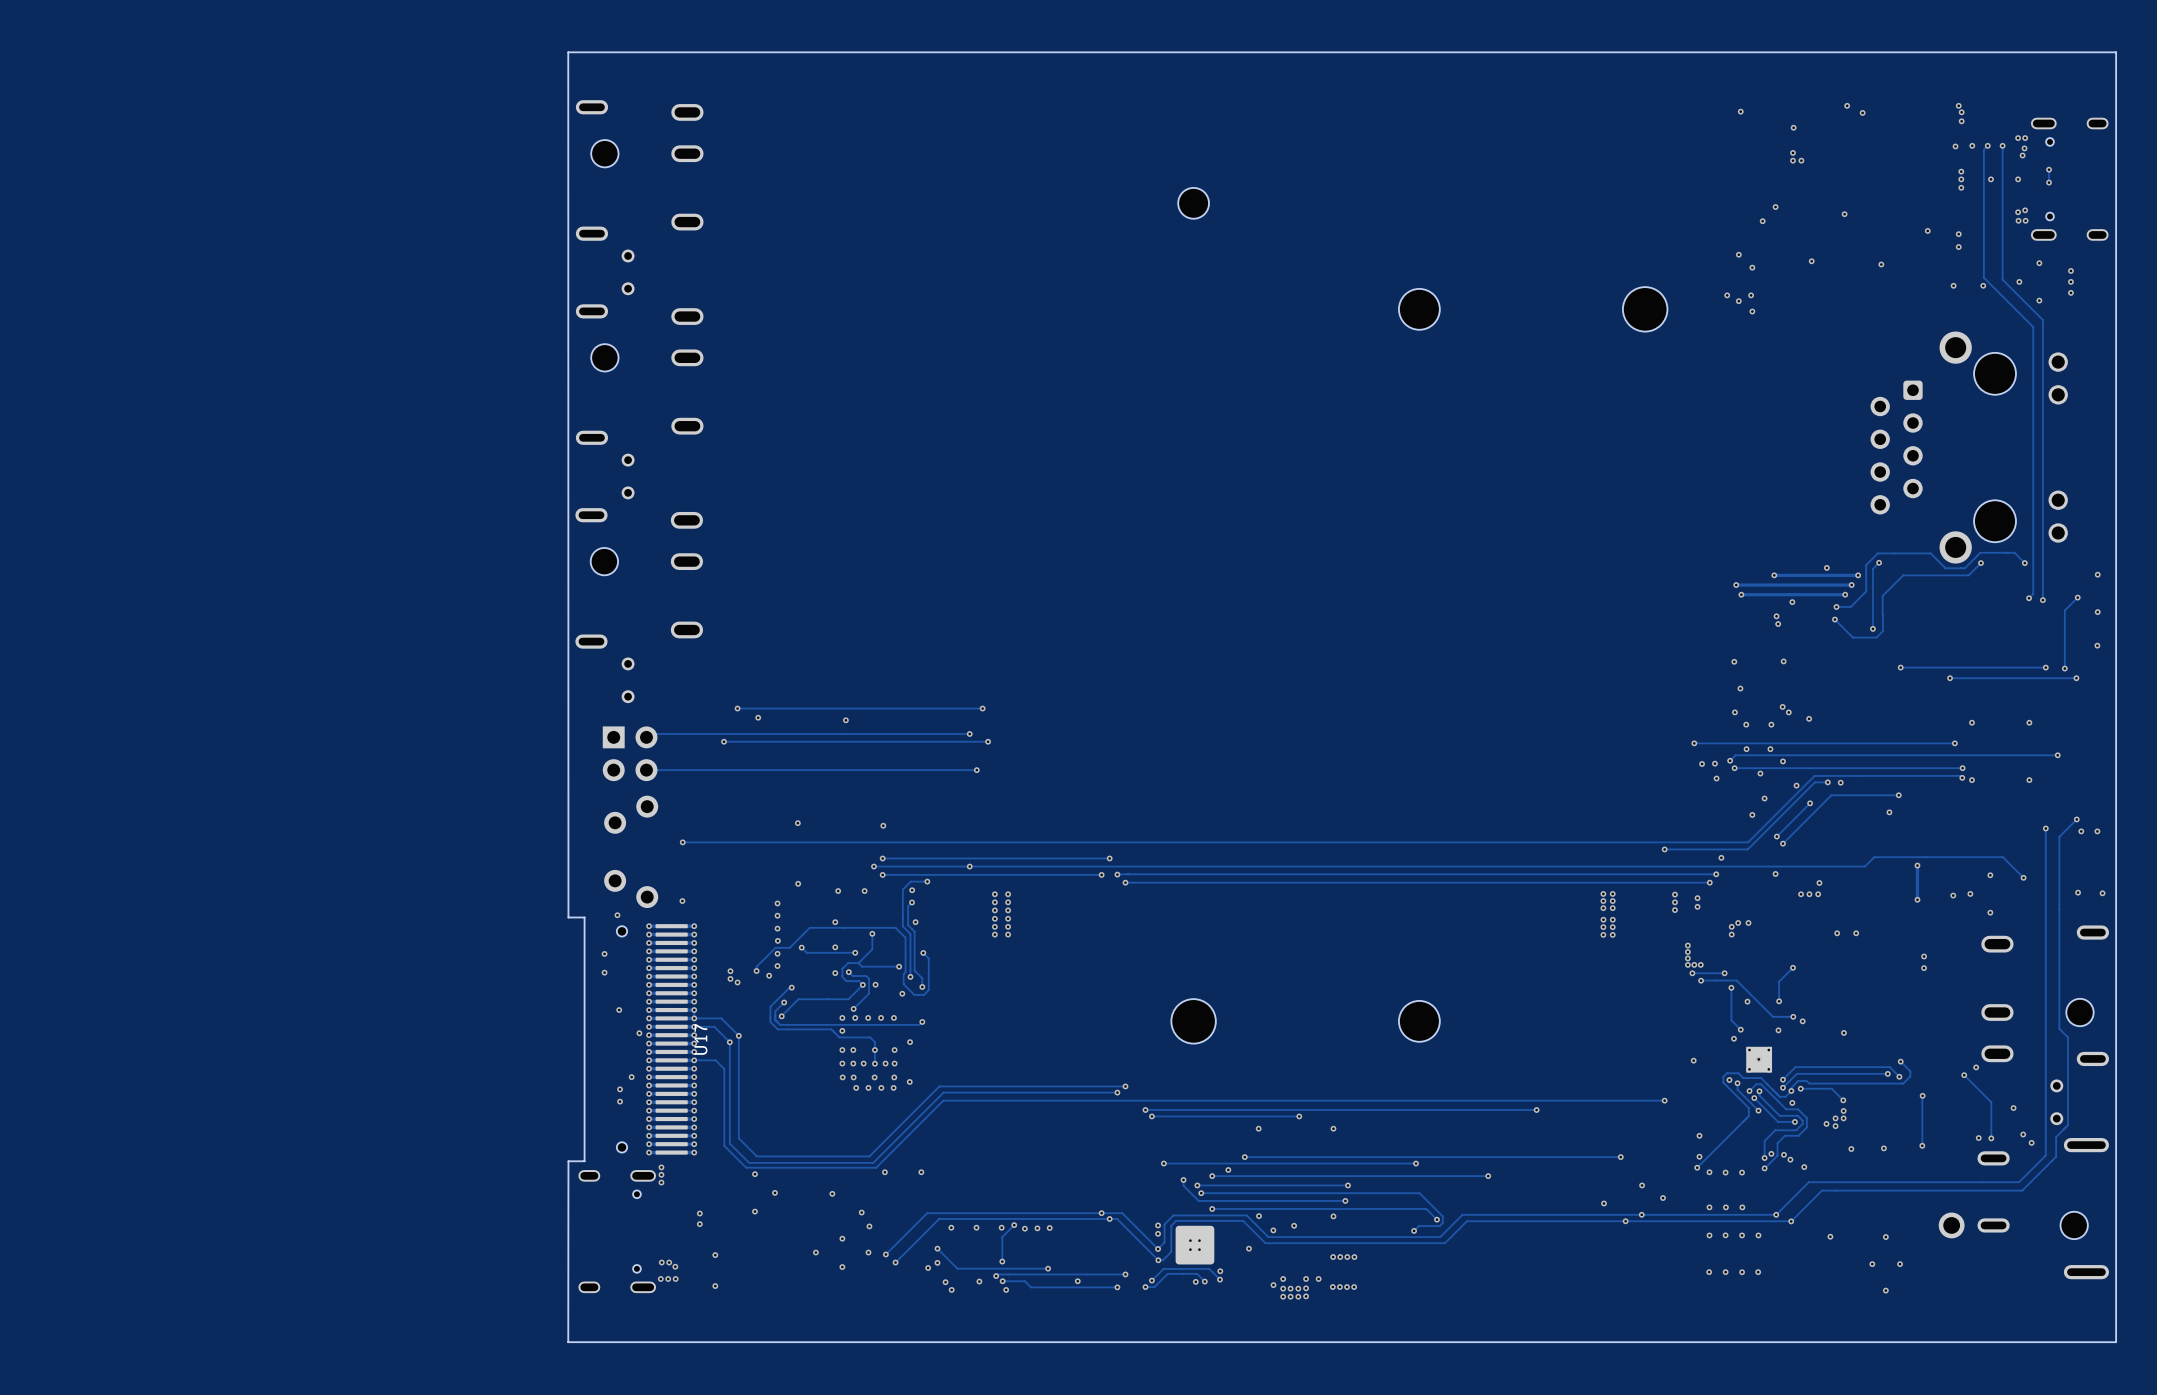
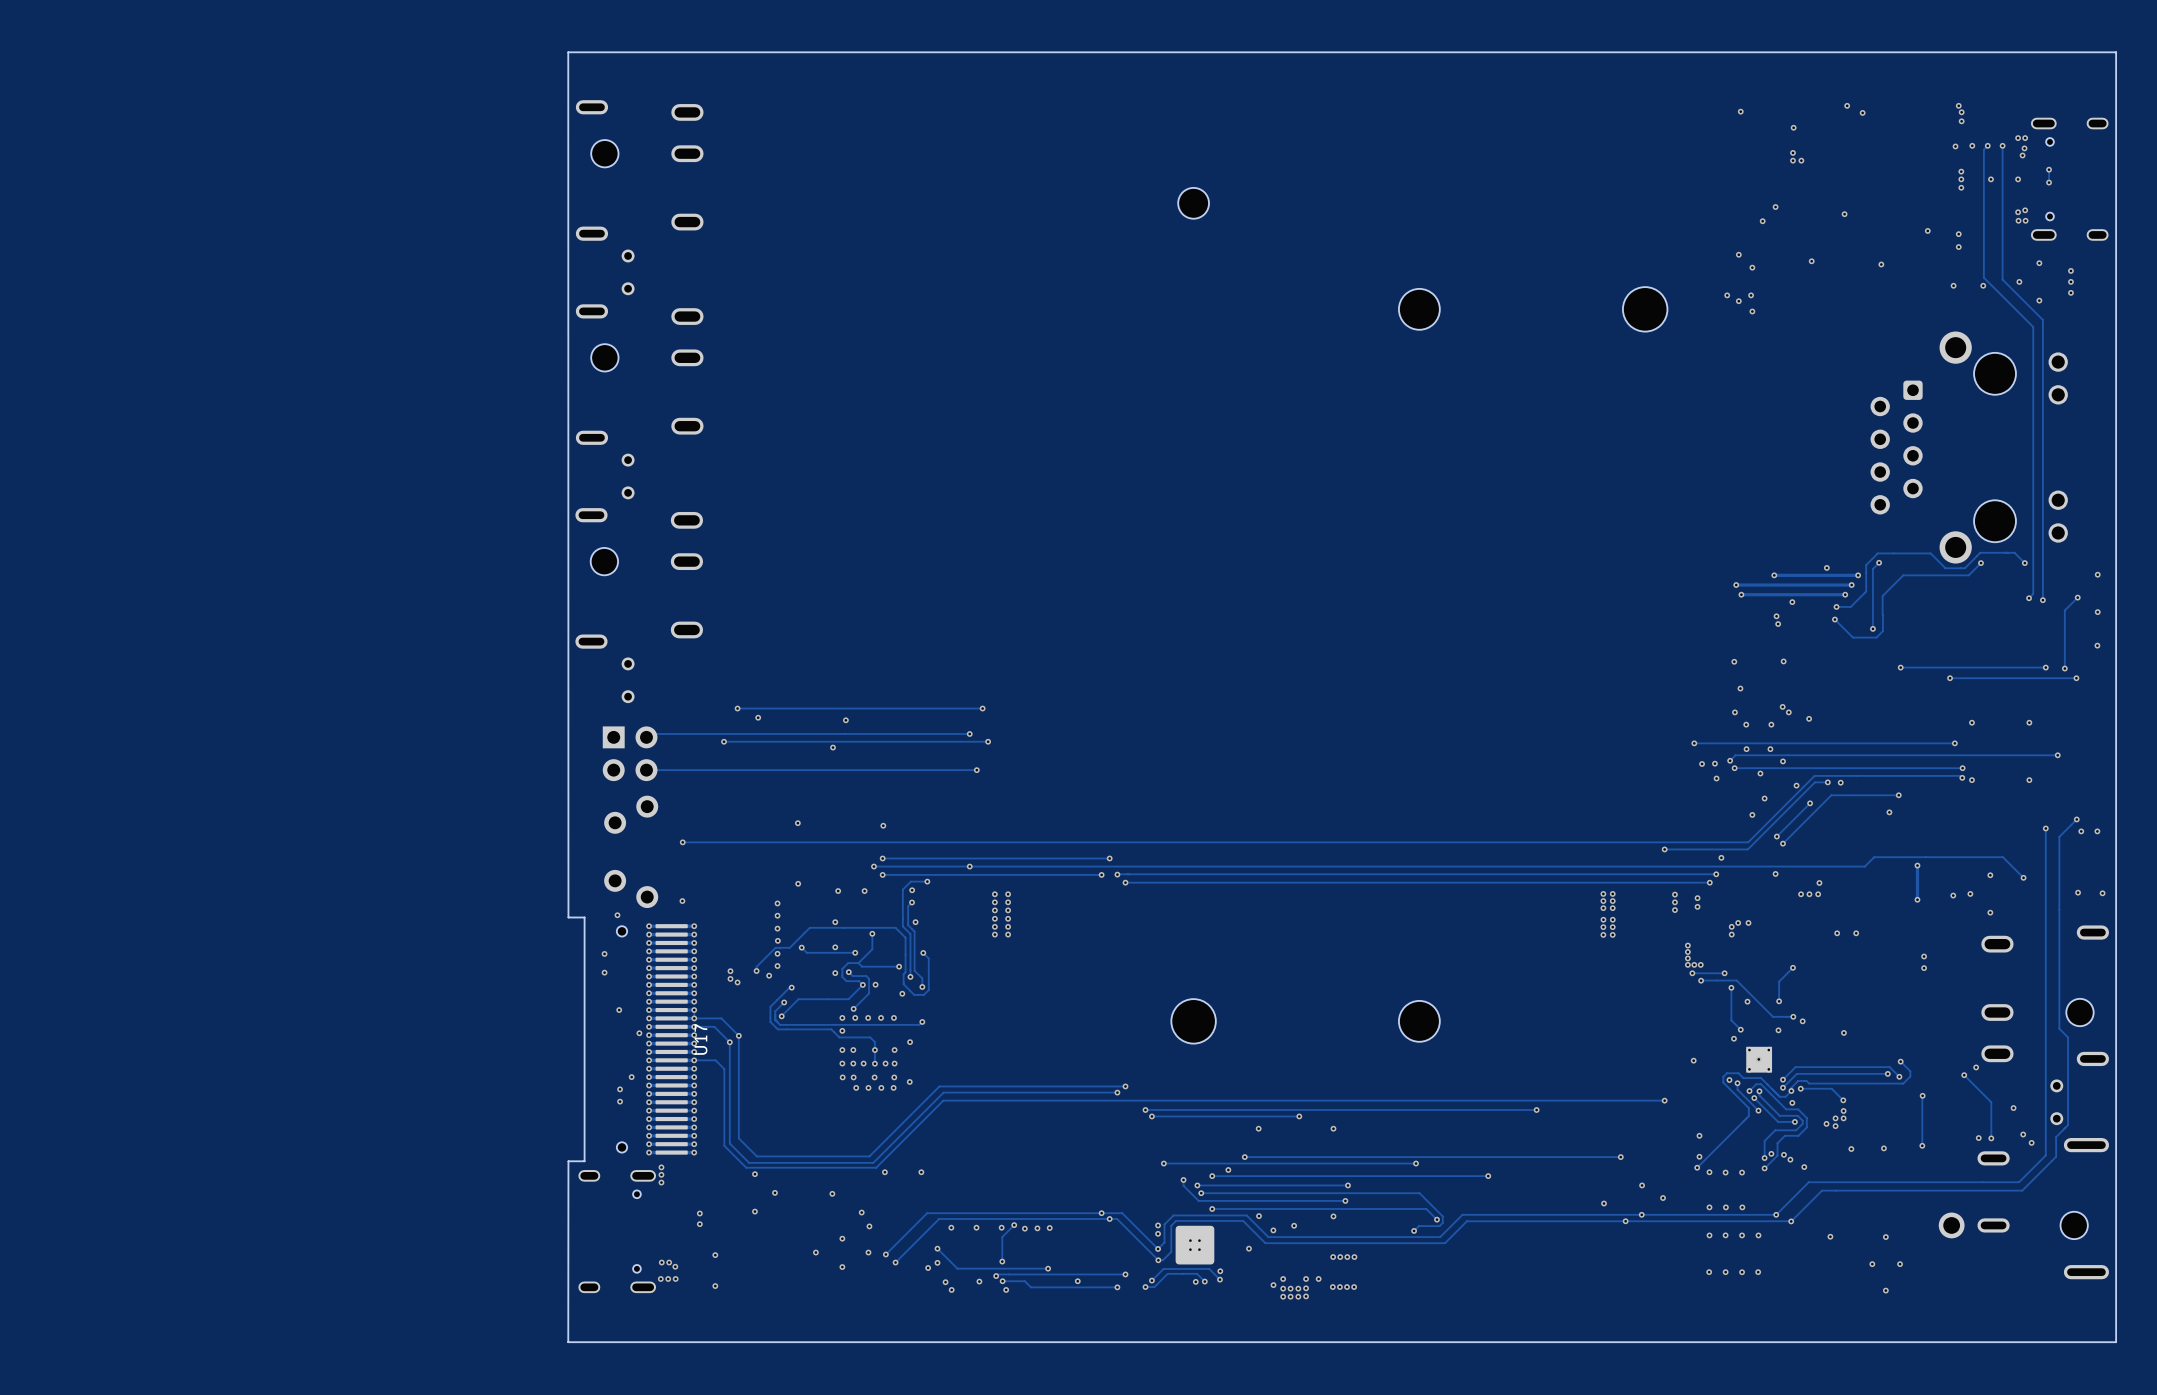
via: none -> (833, 747)

